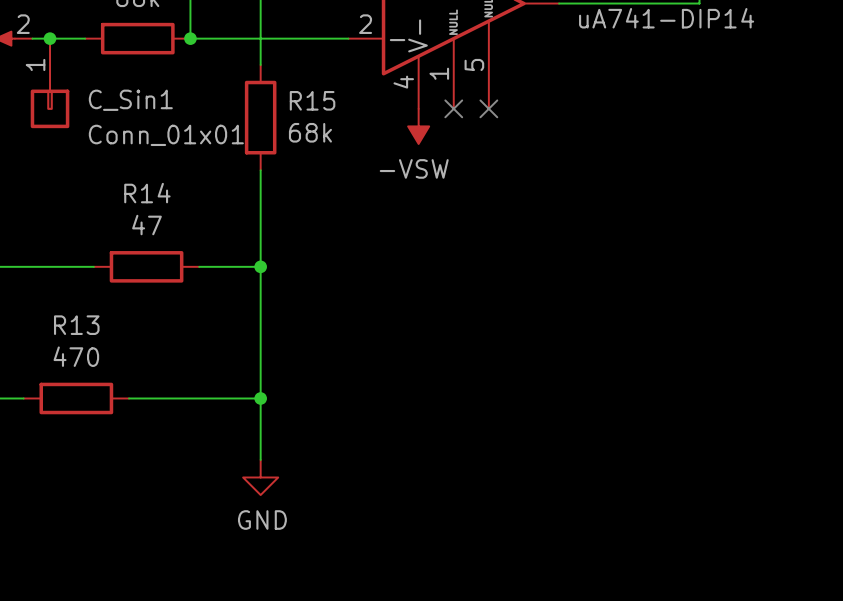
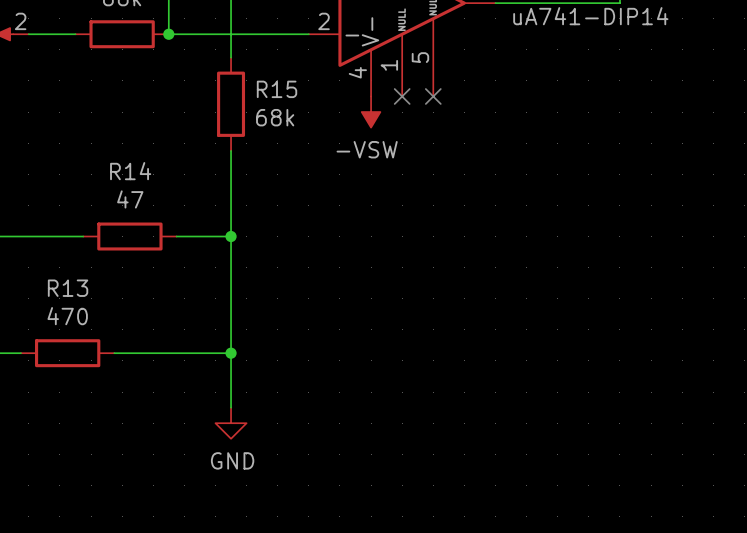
junction: (50, 38) -> none
C_Sin1: Conn_01x01 (50, 83) -> none

